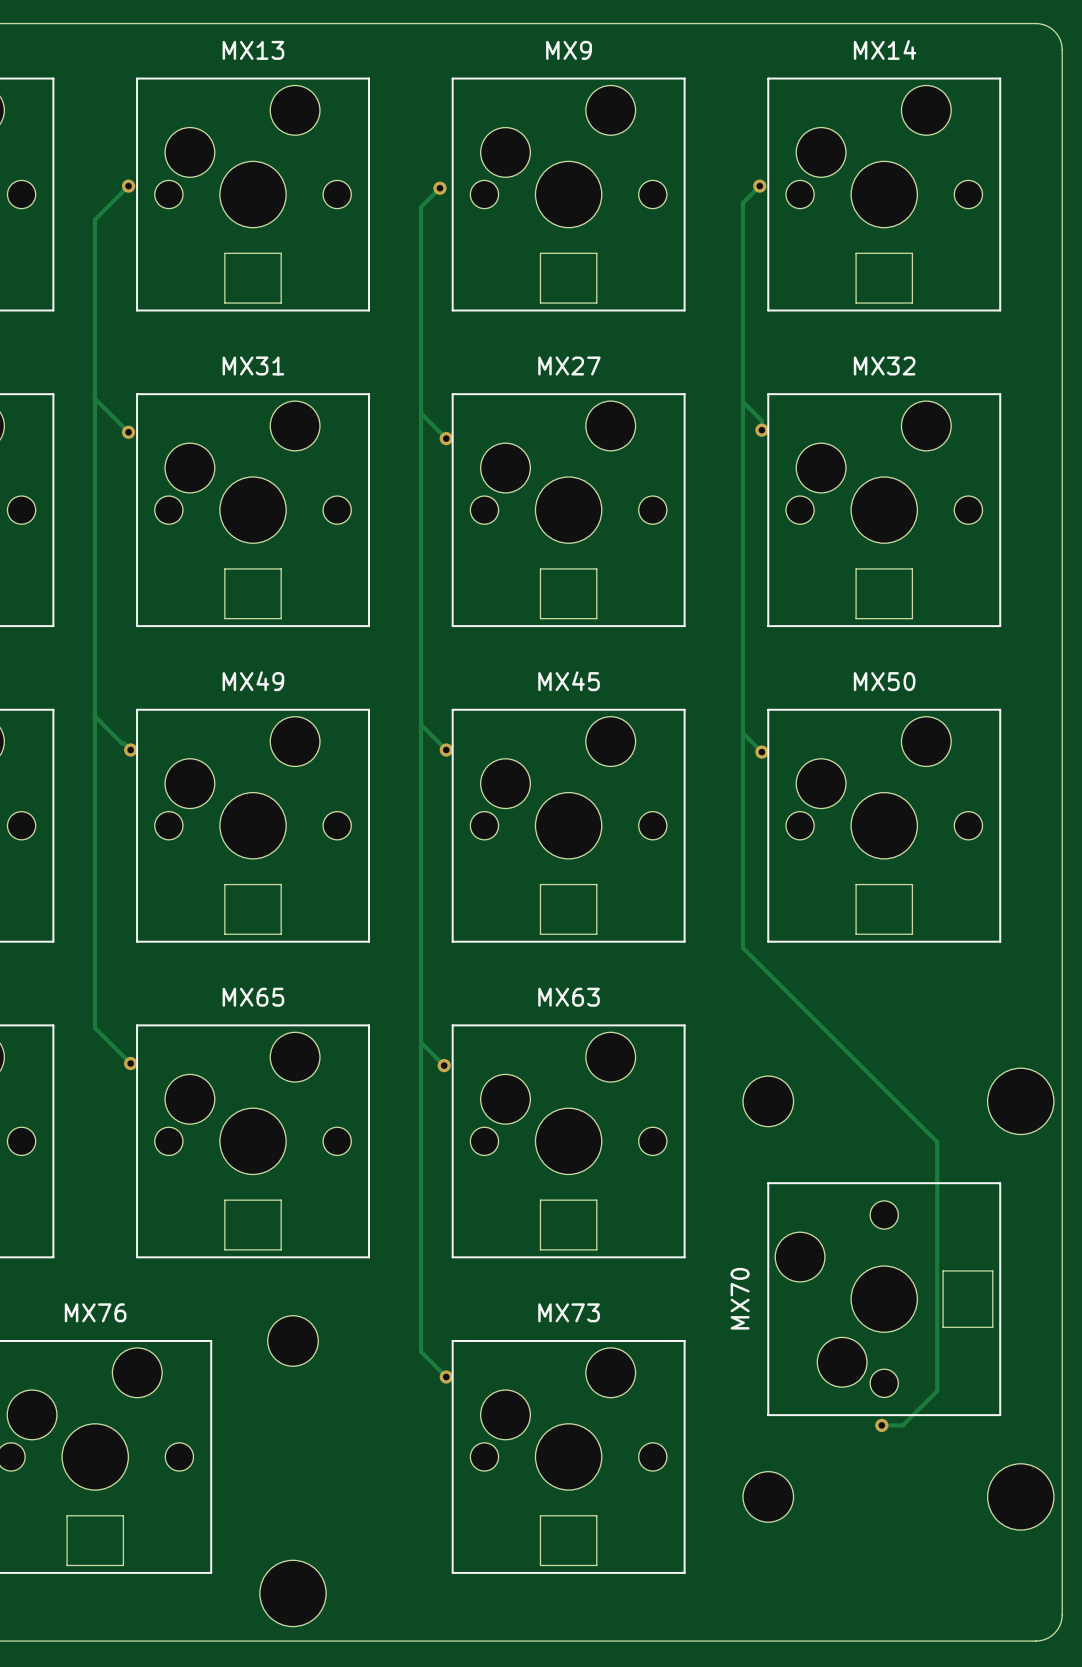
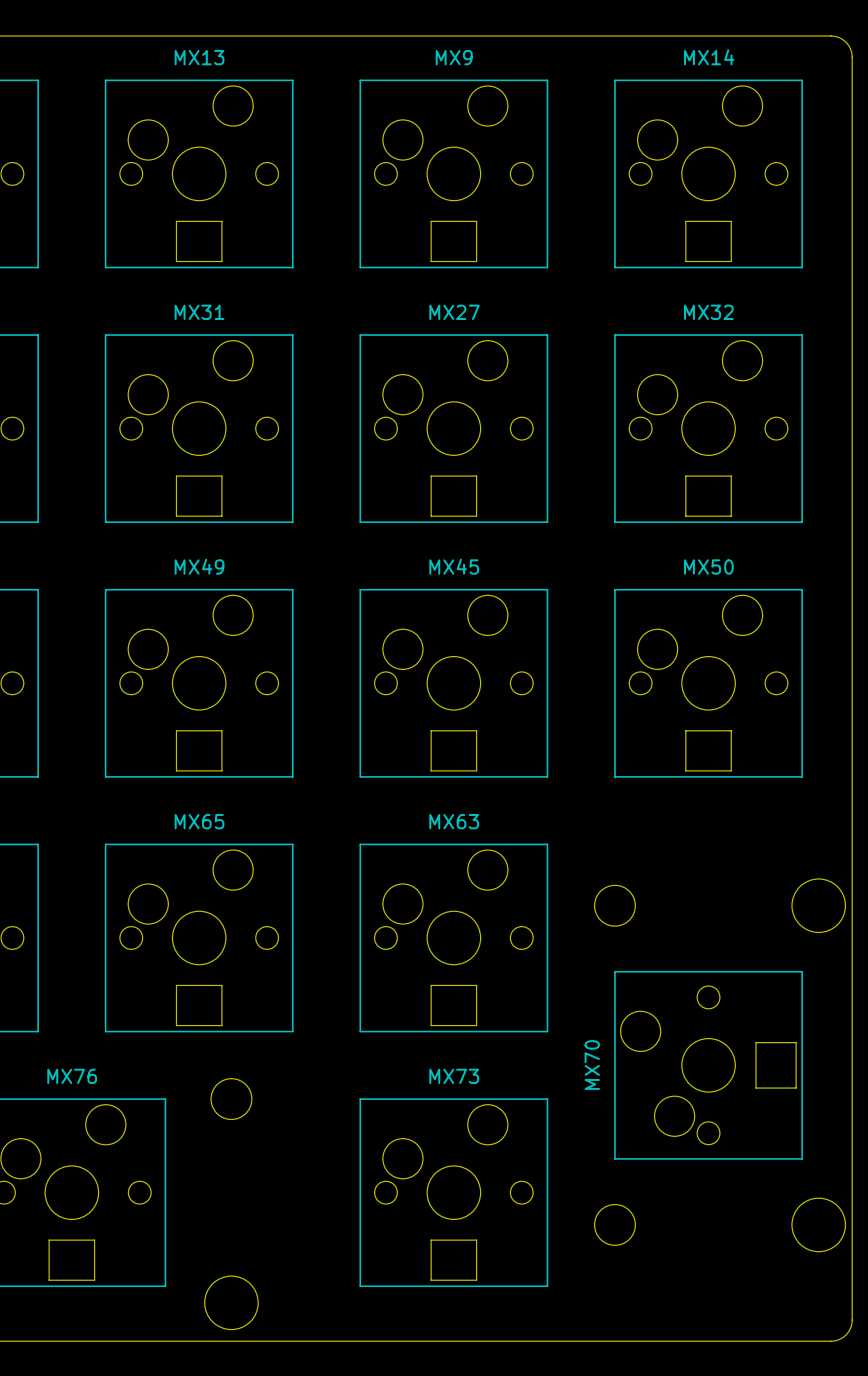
track: (128, 186) (94, 219) (94, 1027) (130, 1063) -> none
via: (128, 186) -> none
track: (759, 186) (742, 202) (742, 947) (937, 1142) (937, 1391) (902, 1425) (881, 1425) -> none
via: (759, 186) -> none
track: (439, 188) (421, 207) (421, 1351) (446, 1377) -> none
via: (439, 188) -> none
track: (94, 398) (128, 432) -> none
track: (742, 401) (761, 420) (761, 430) -> none
track: (421, 413) (446, 438) -> none
via: (761, 430) -> none
via: (128, 432) -> none
via: (446, 438) -> none
track: (94, 716) (130, 749) -> none
track: (421, 724) (446, 749) -> none
track: (742, 735) (761, 752) -> none
via: (130, 749) -> none
via: (446, 749) -> none
via: (761, 752) -> none
track: (421, 1042) (444, 1065) -> none
via: (130, 1063) -> none
via: (444, 1065) -> none
via: (446, 1377) -> none
via: (881, 1425) -> none

